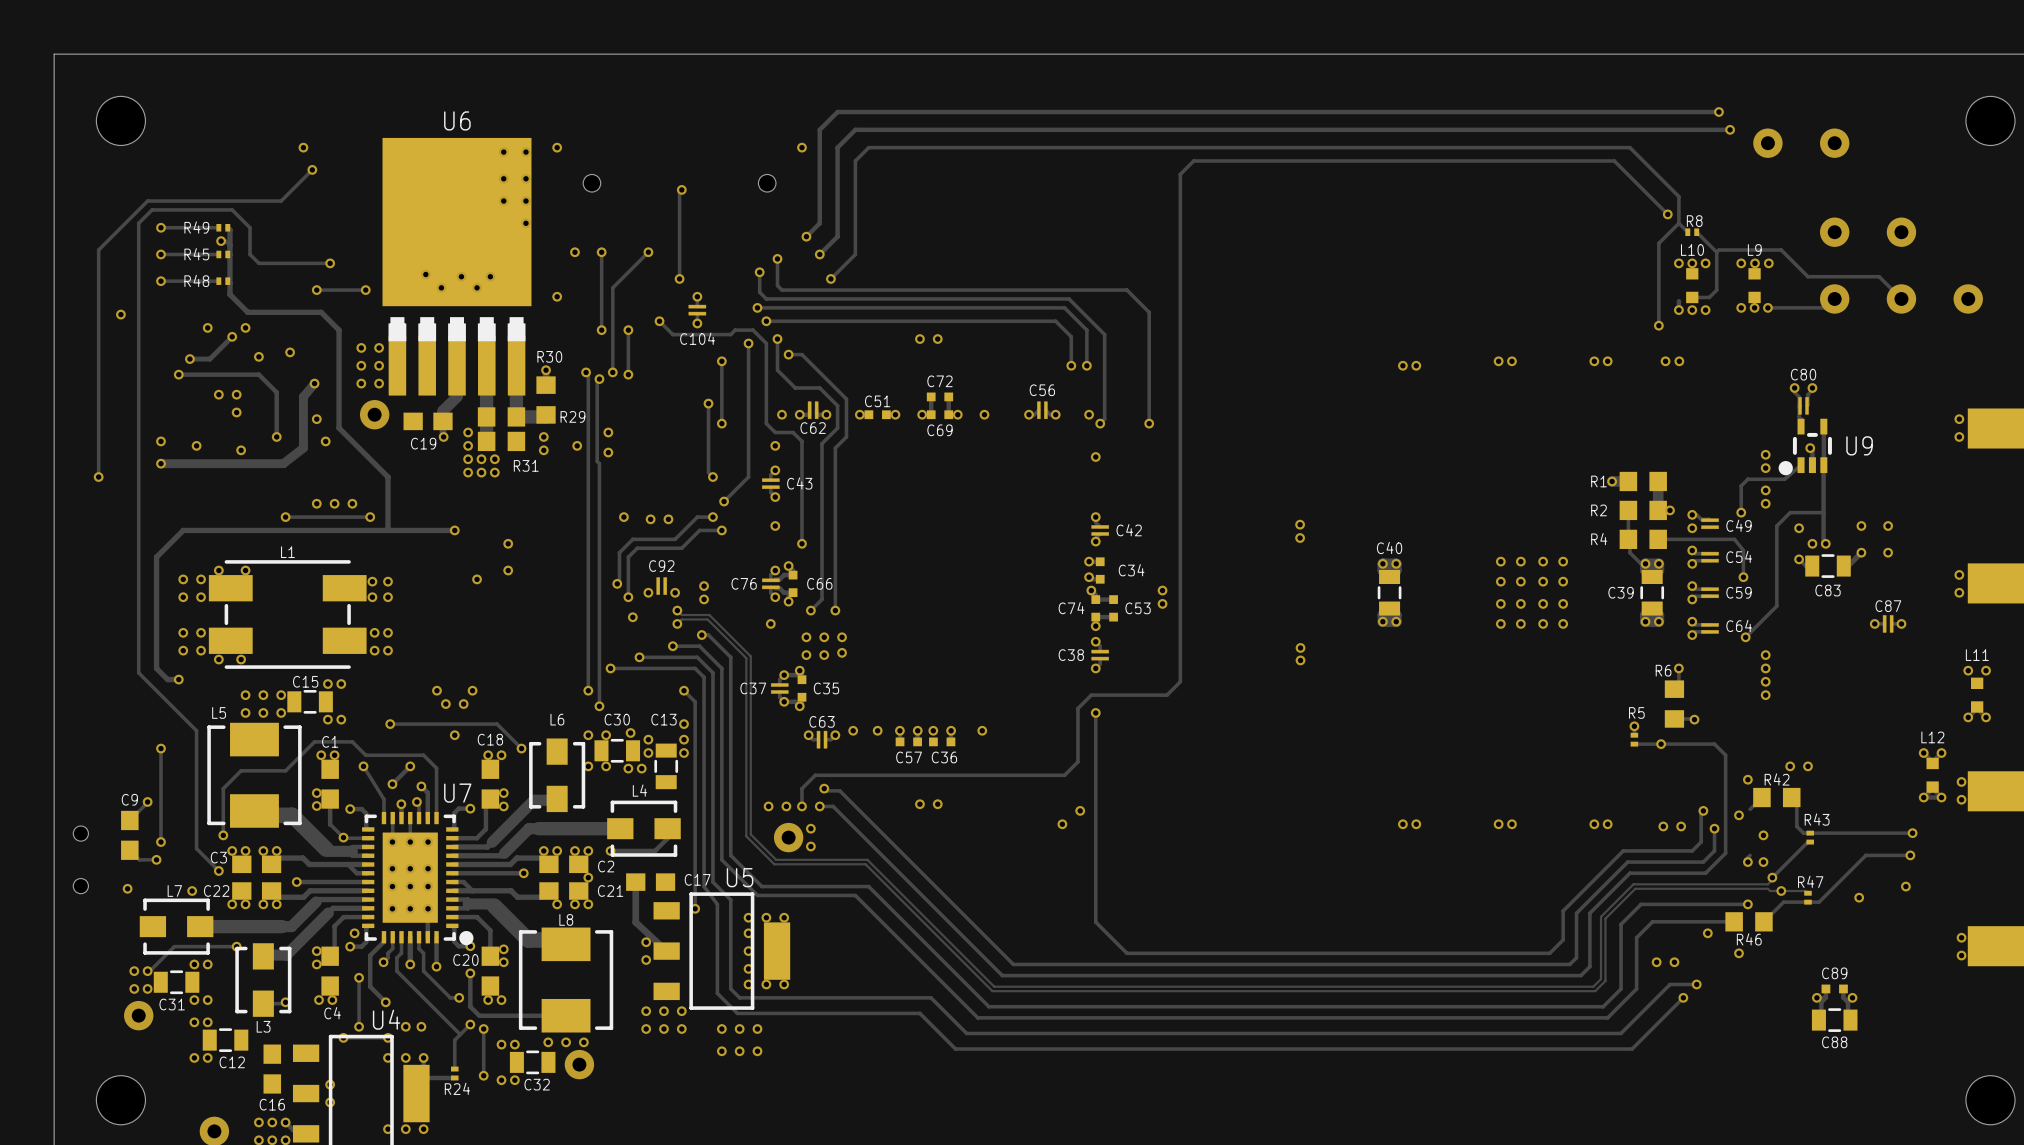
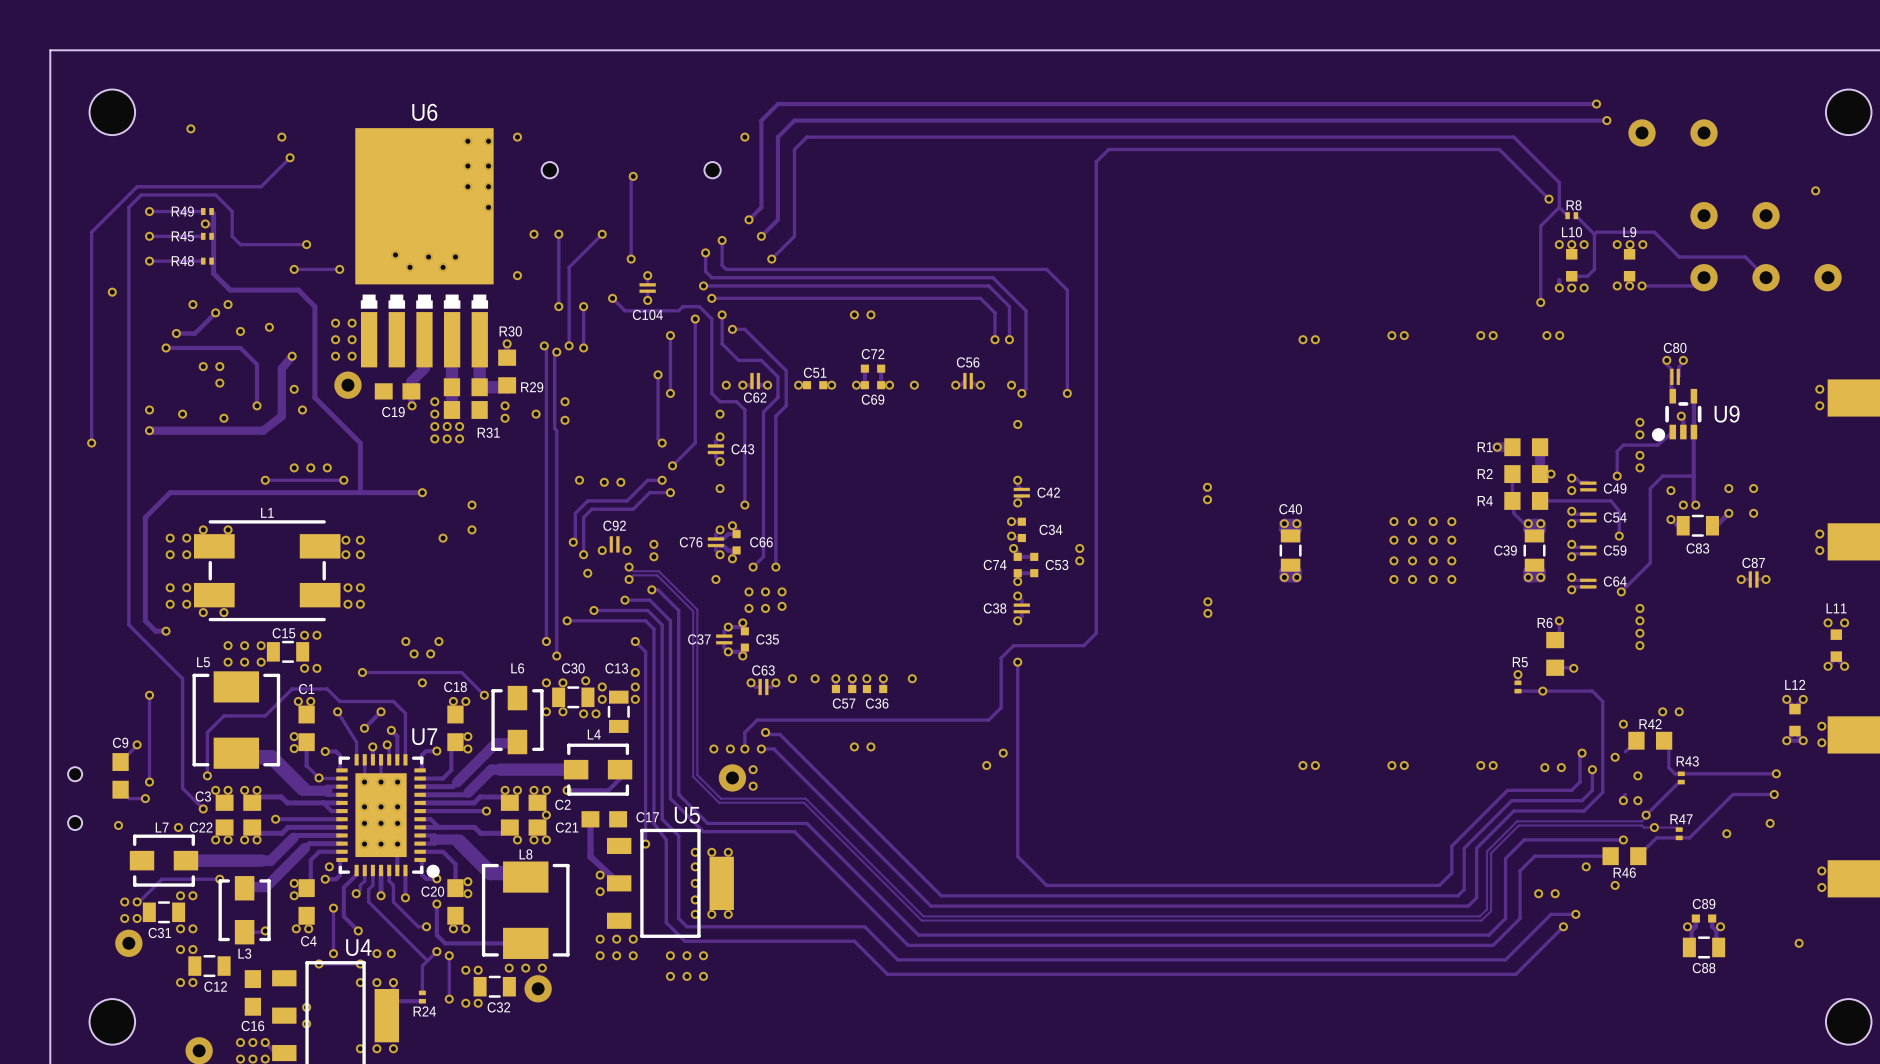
U6 footprint: [382, 137, 532, 396] -> [355, 128, 494, 368]
via: none -> (190, 128)
via: none -> (1815, 190)
via: none -> (1799, 943)

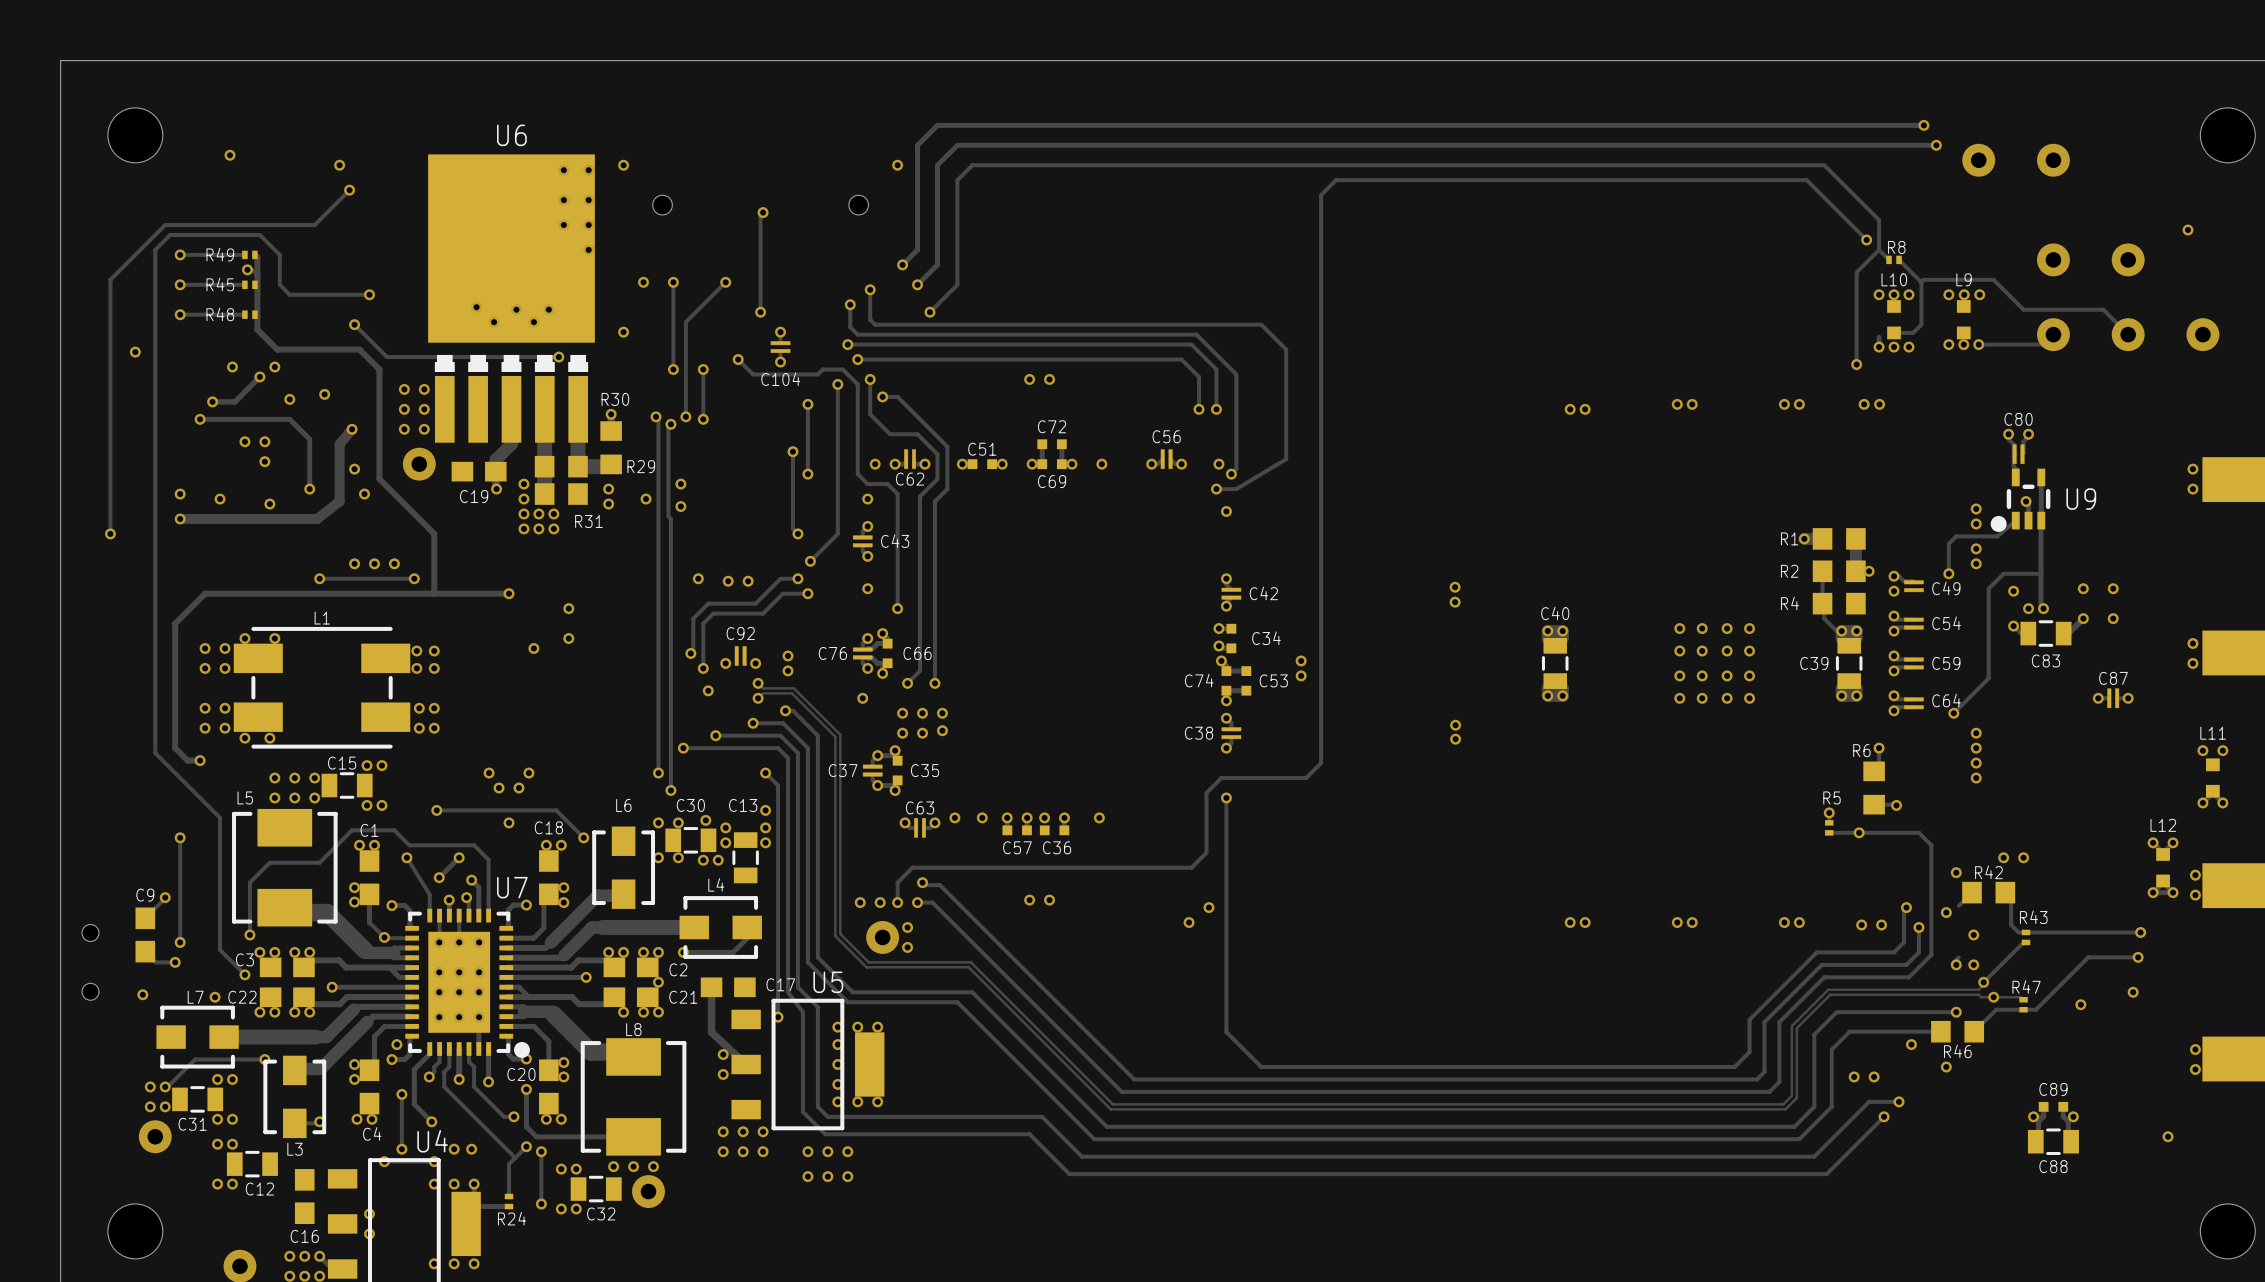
track: (339, 269) (294, 269) -> (558, 357) (386, 357) (354, 324)
via: (339, 269) -> none
via: none -> (558, 357)
track: (1067, 381) (1067, 393) -> (1286, 459) (1236, 489) (1216, 489)
via position: (1067, 393) -> (1216, 489)
track: (1540, 500) (1611, 500) (1619, 511) (1619, 536) -> none
via: (1619, 536) -> none

